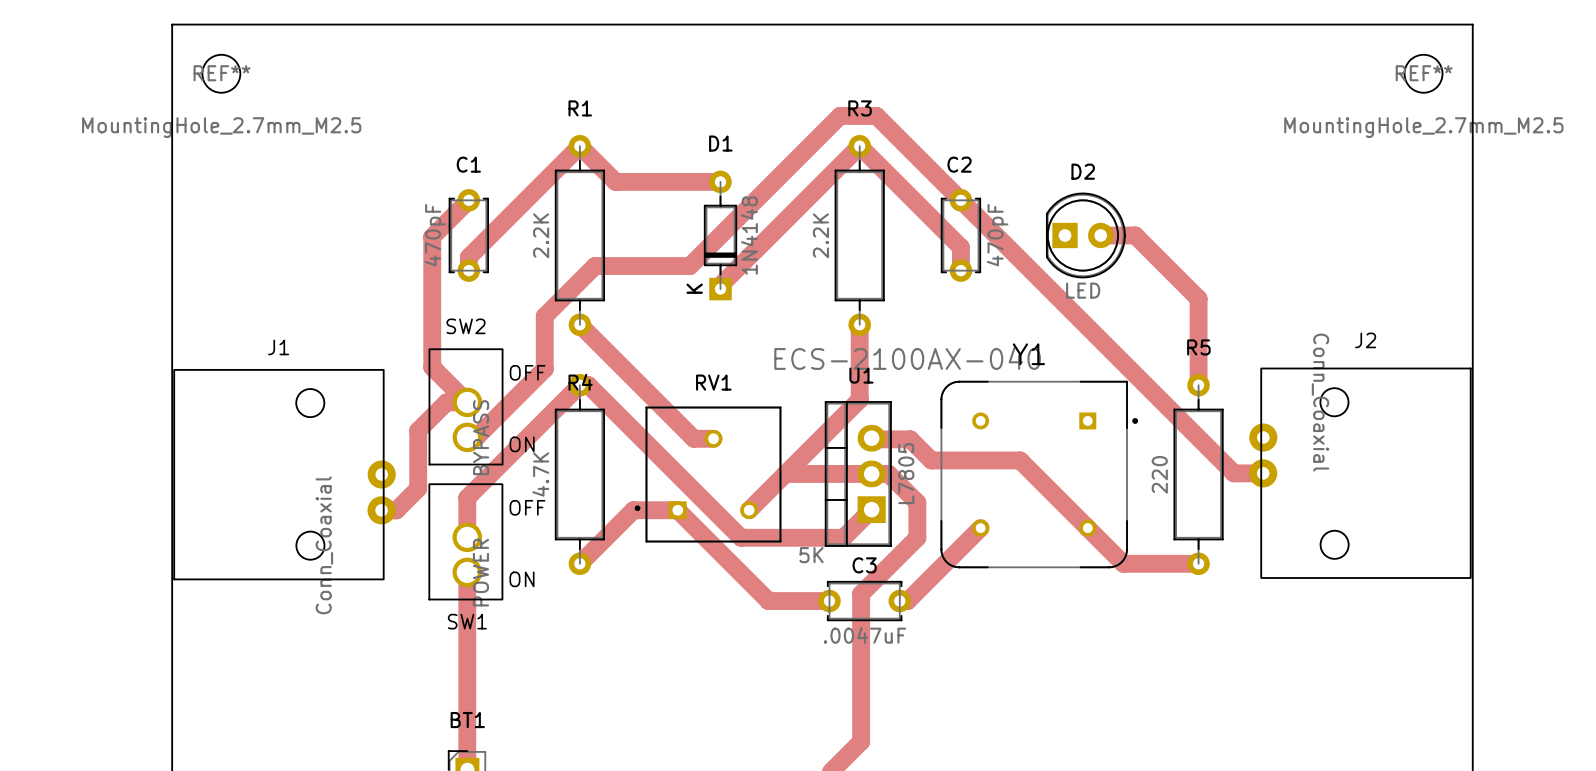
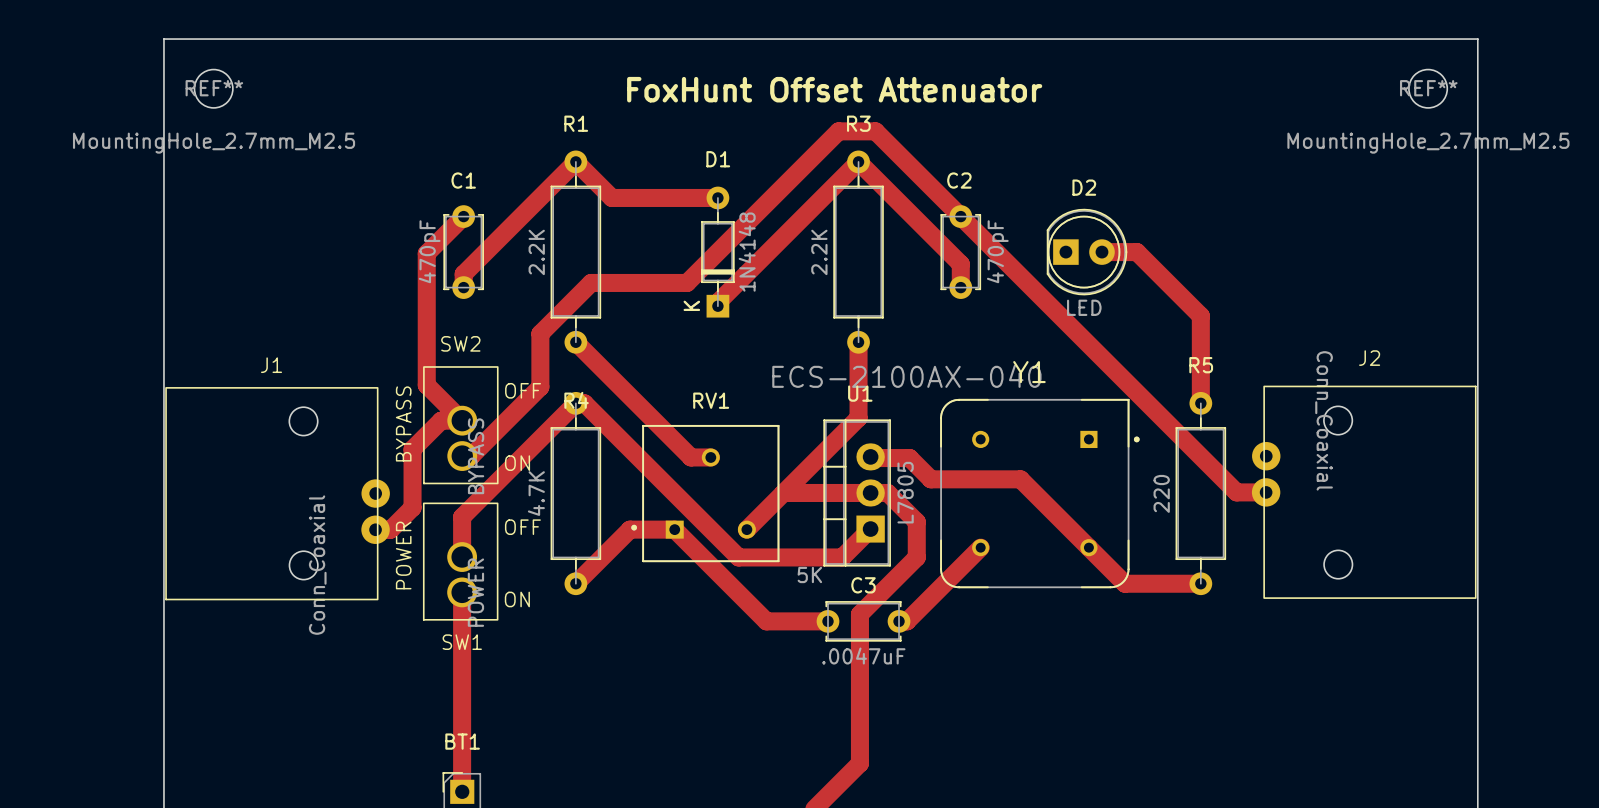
text: none -> FoxHunt Offset Attenuator (834, 89)
text: none -> BYPASS (403, 423)
text: none -> POWER (403, 555)

